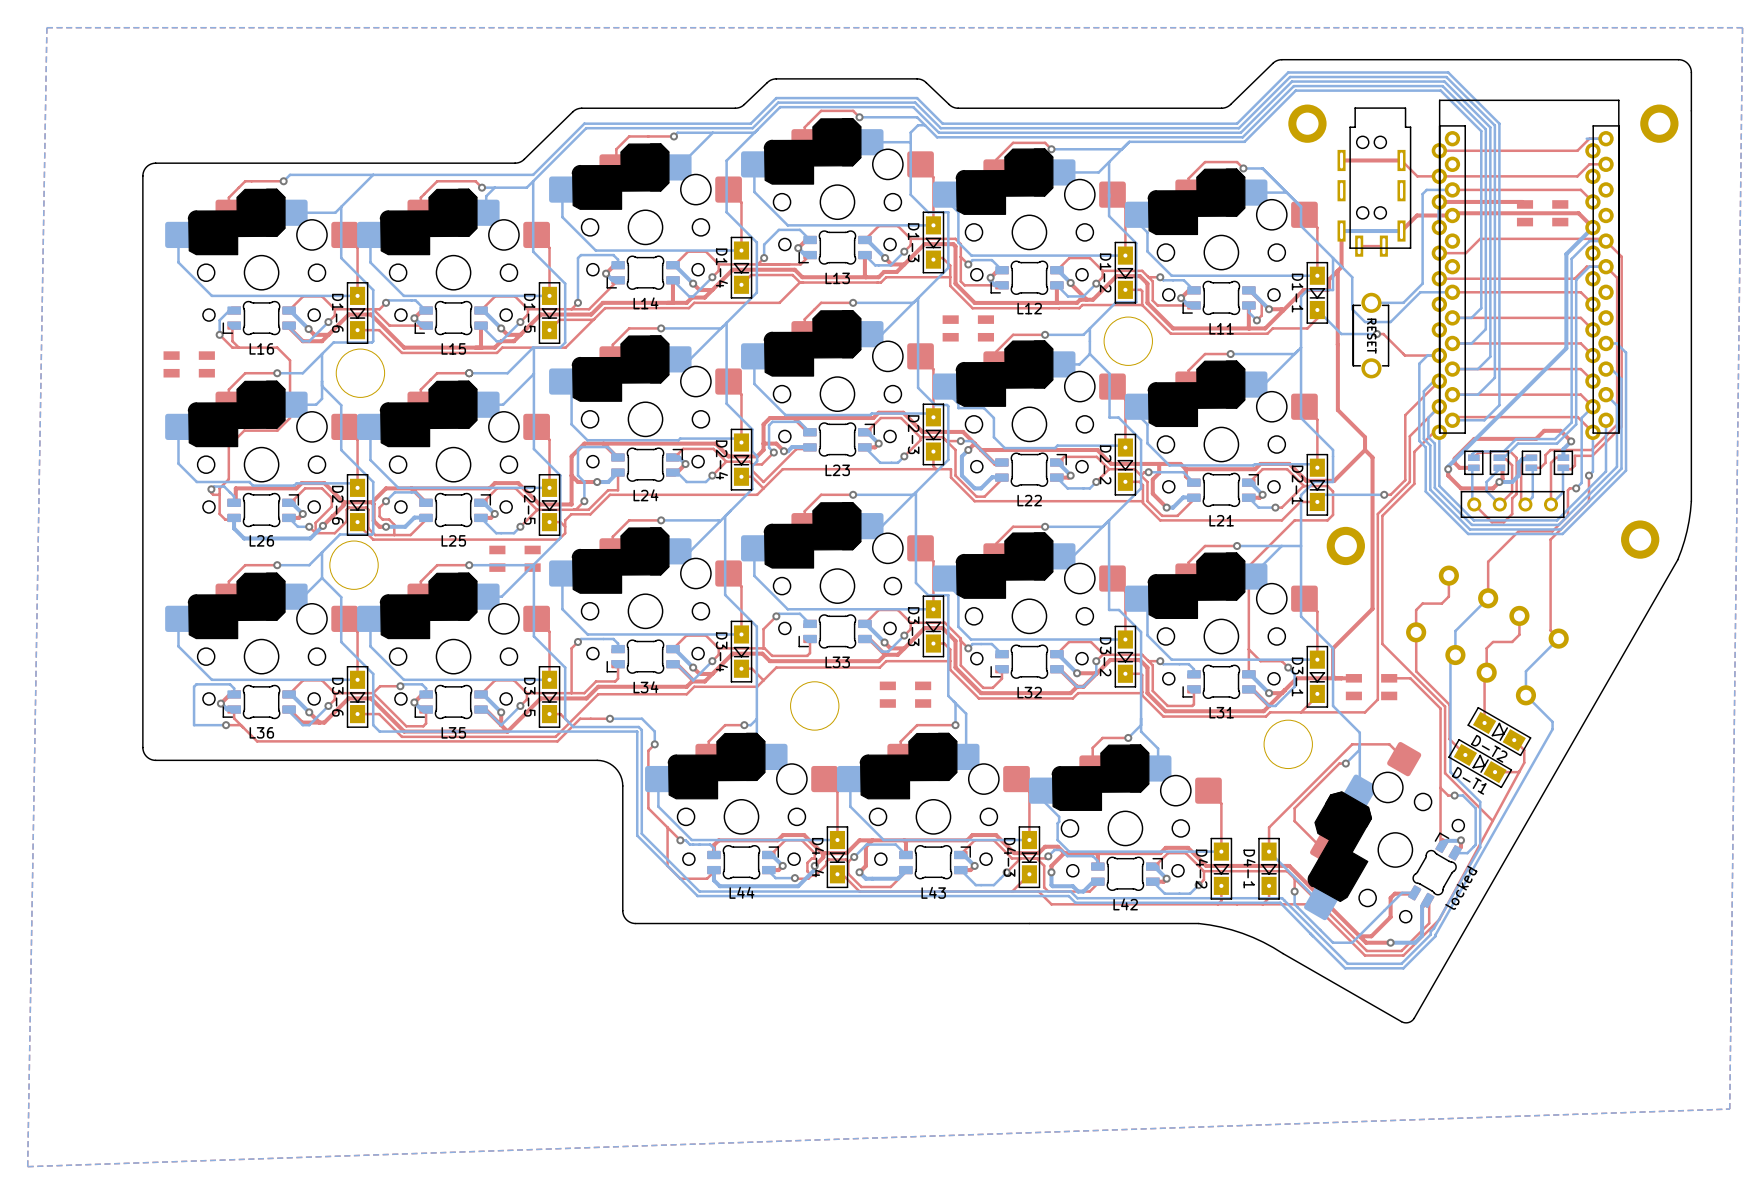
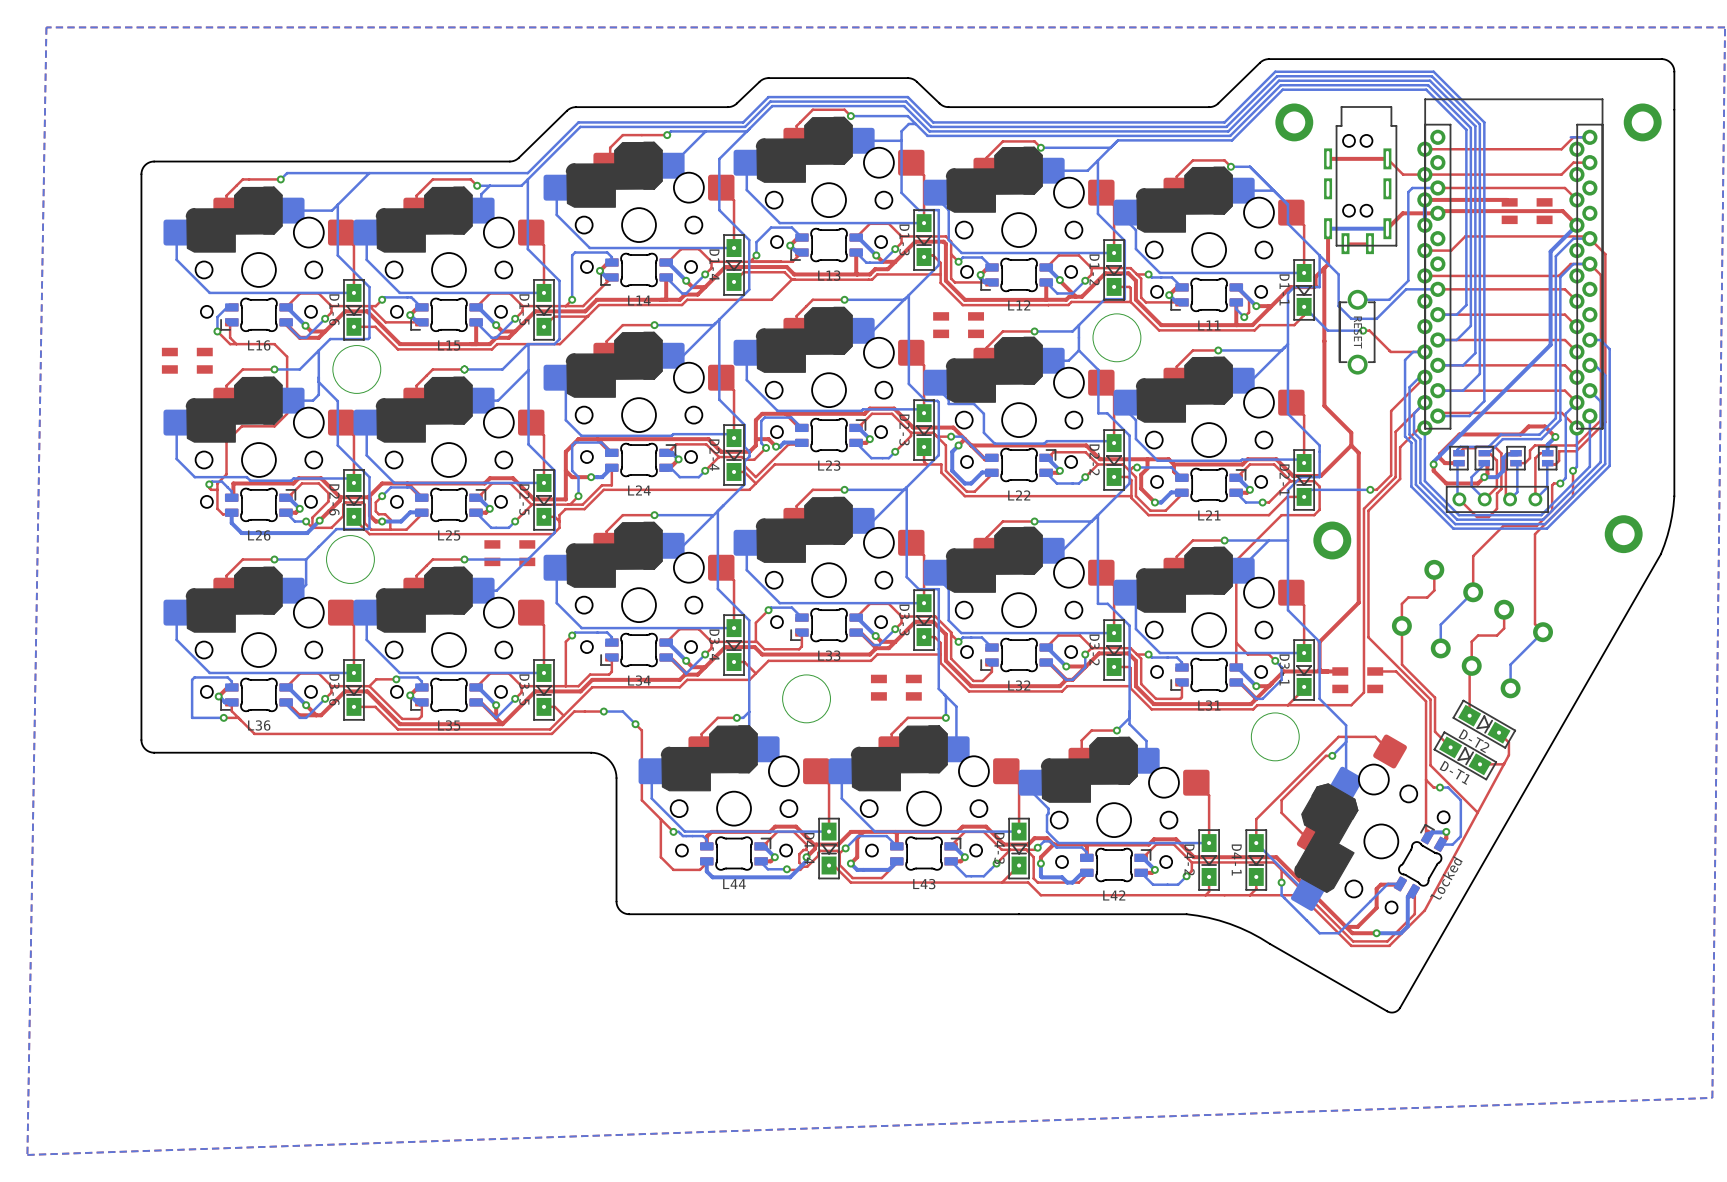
bottom track: (322, 552) (322, 577) -> none
bottom track: (533, 564) (533, 636) (565, 667) (565, 718) (573, 727) (638, 727) (641, 729) (641, 833) (699, 891) (1070, 891) (1077, 898) (1282, 898) (1347, 963) (1401, 963) (1430, 934) (1480, 847) (1480, 801) (1450, 772) (1450, 659) -> none
bottom track: (322, 577) (309, 590) -> (306, 559) (306, 584)
bottom track: (322, 577) (341, 597) (341, 641) (373, 673) (373, 725) (379, 731) (636, 731) (637, 835) (697, 896) (1068, 896) (1075, 902) (1280, 902) (1313, 936) -> none
bottom track: (1525, 695) (1552, 721) (1552, 729) (1435, 934) -> none
bottom track: (629, 718) (641, 718) (654, 731) (654, 744) -> (622, 711) (635, 724)
top track: (654, 744) (648, 750) -> (635, 724) (641, 730) (641, 743)
via position: (654, 744) -> (635, 724)
bottom track: (1310, 933) (1345, 968) (1403, 968) (1435, 934) -> none

